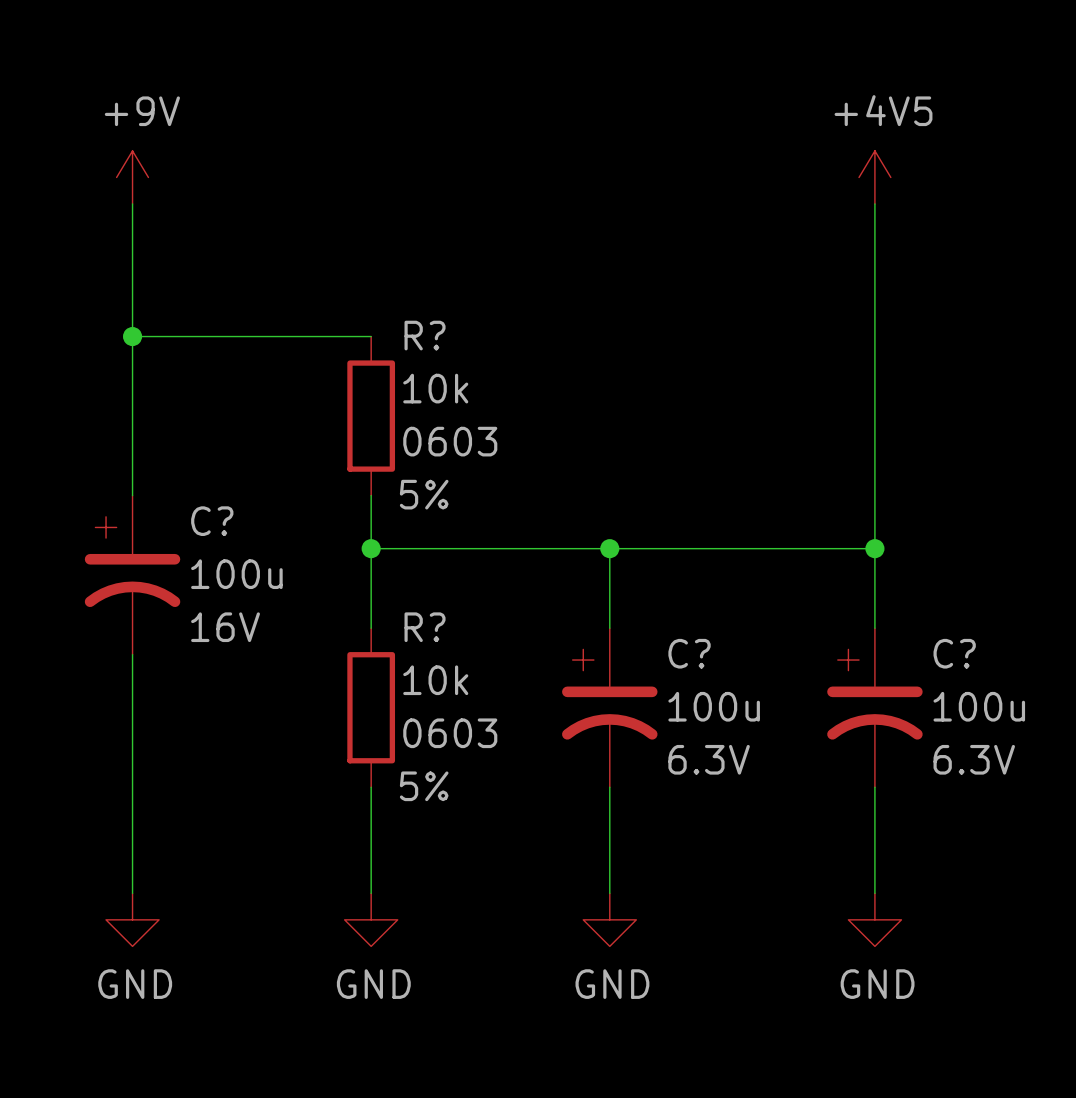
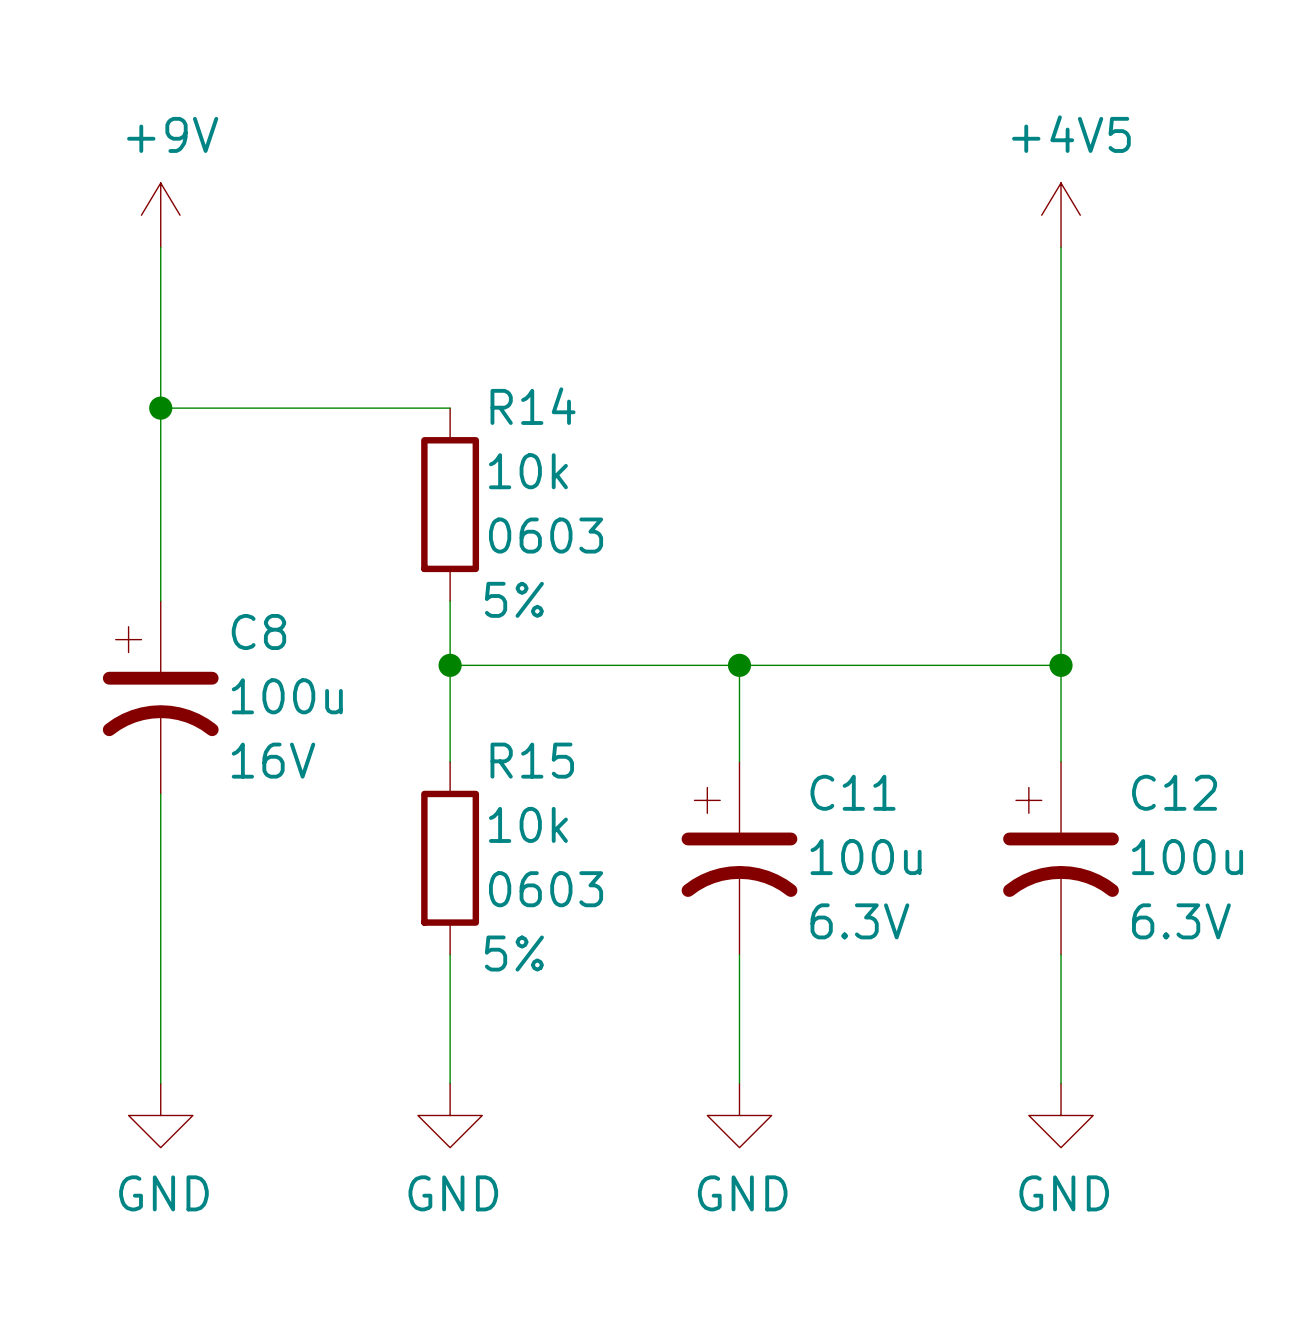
R? name: R? (425, 335) -> R14 (533, 406)
C? name: C? (212, 521) -> C8 (258, 631)
R? name: R? (425, 627) -> R15 (532, 760)
C? name: C? (689, 653) -> C11 (853, 792)
C? name: C? (954, 653) -> C12 (1174, 792)

